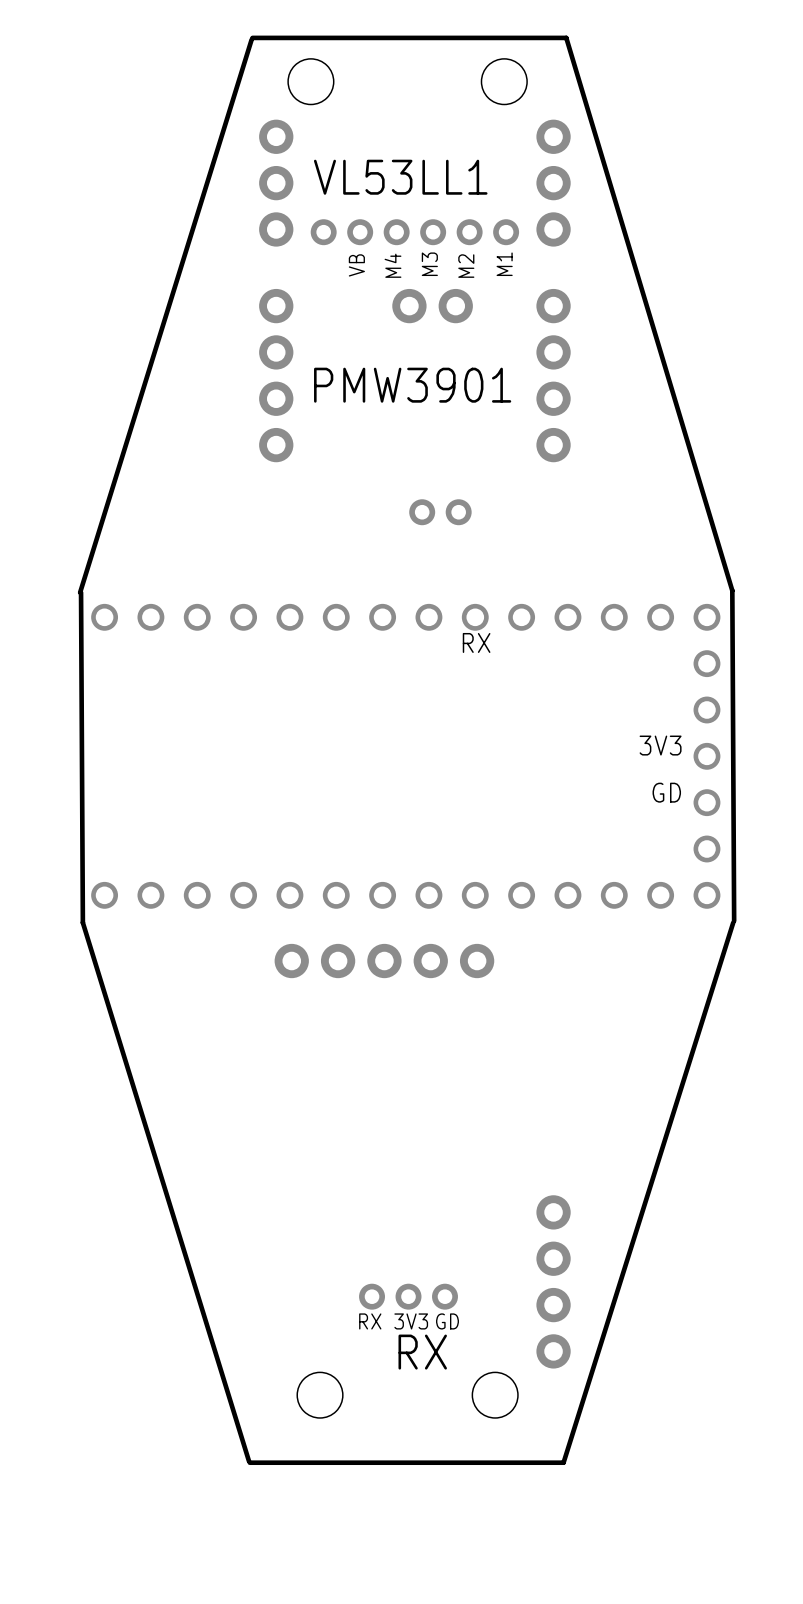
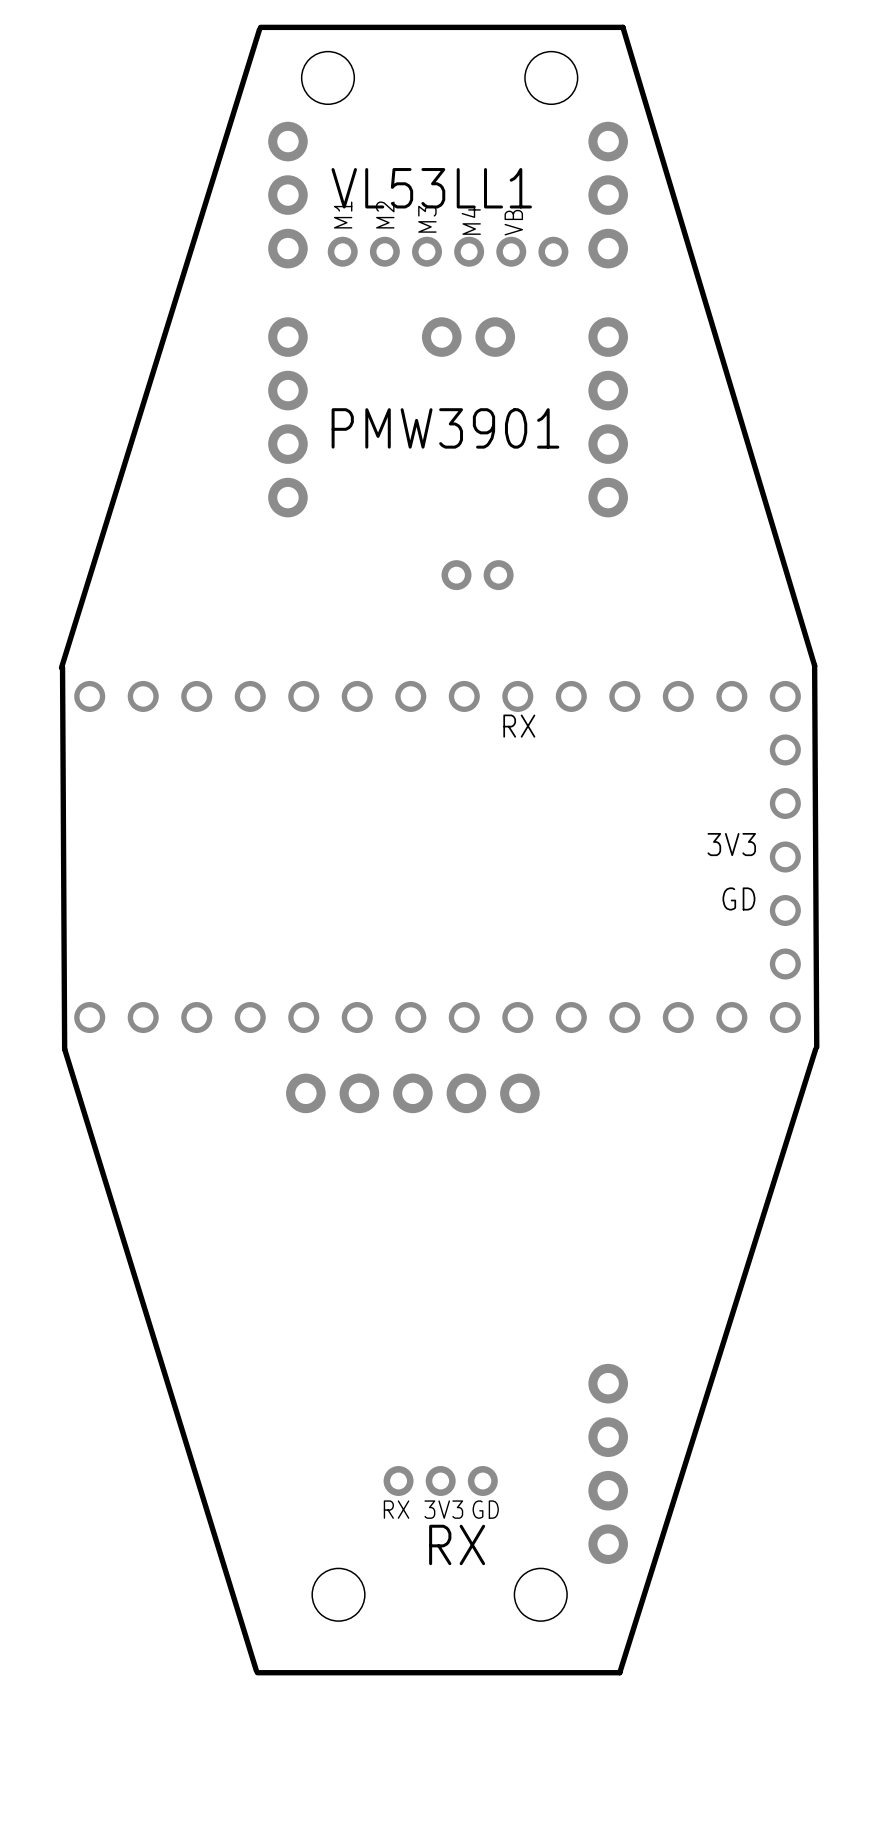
text position: M3 (429, 264) -> M3 (427, 219)
text position: M1 (504, 264) -> M1 (343, 215)
text position: VB (356, 265) -> VB (513, 222)
text position: M4 (393, 265) -> M4 (471, 220)
text position: M2 (466, 266) -> M2 (385, 215)

